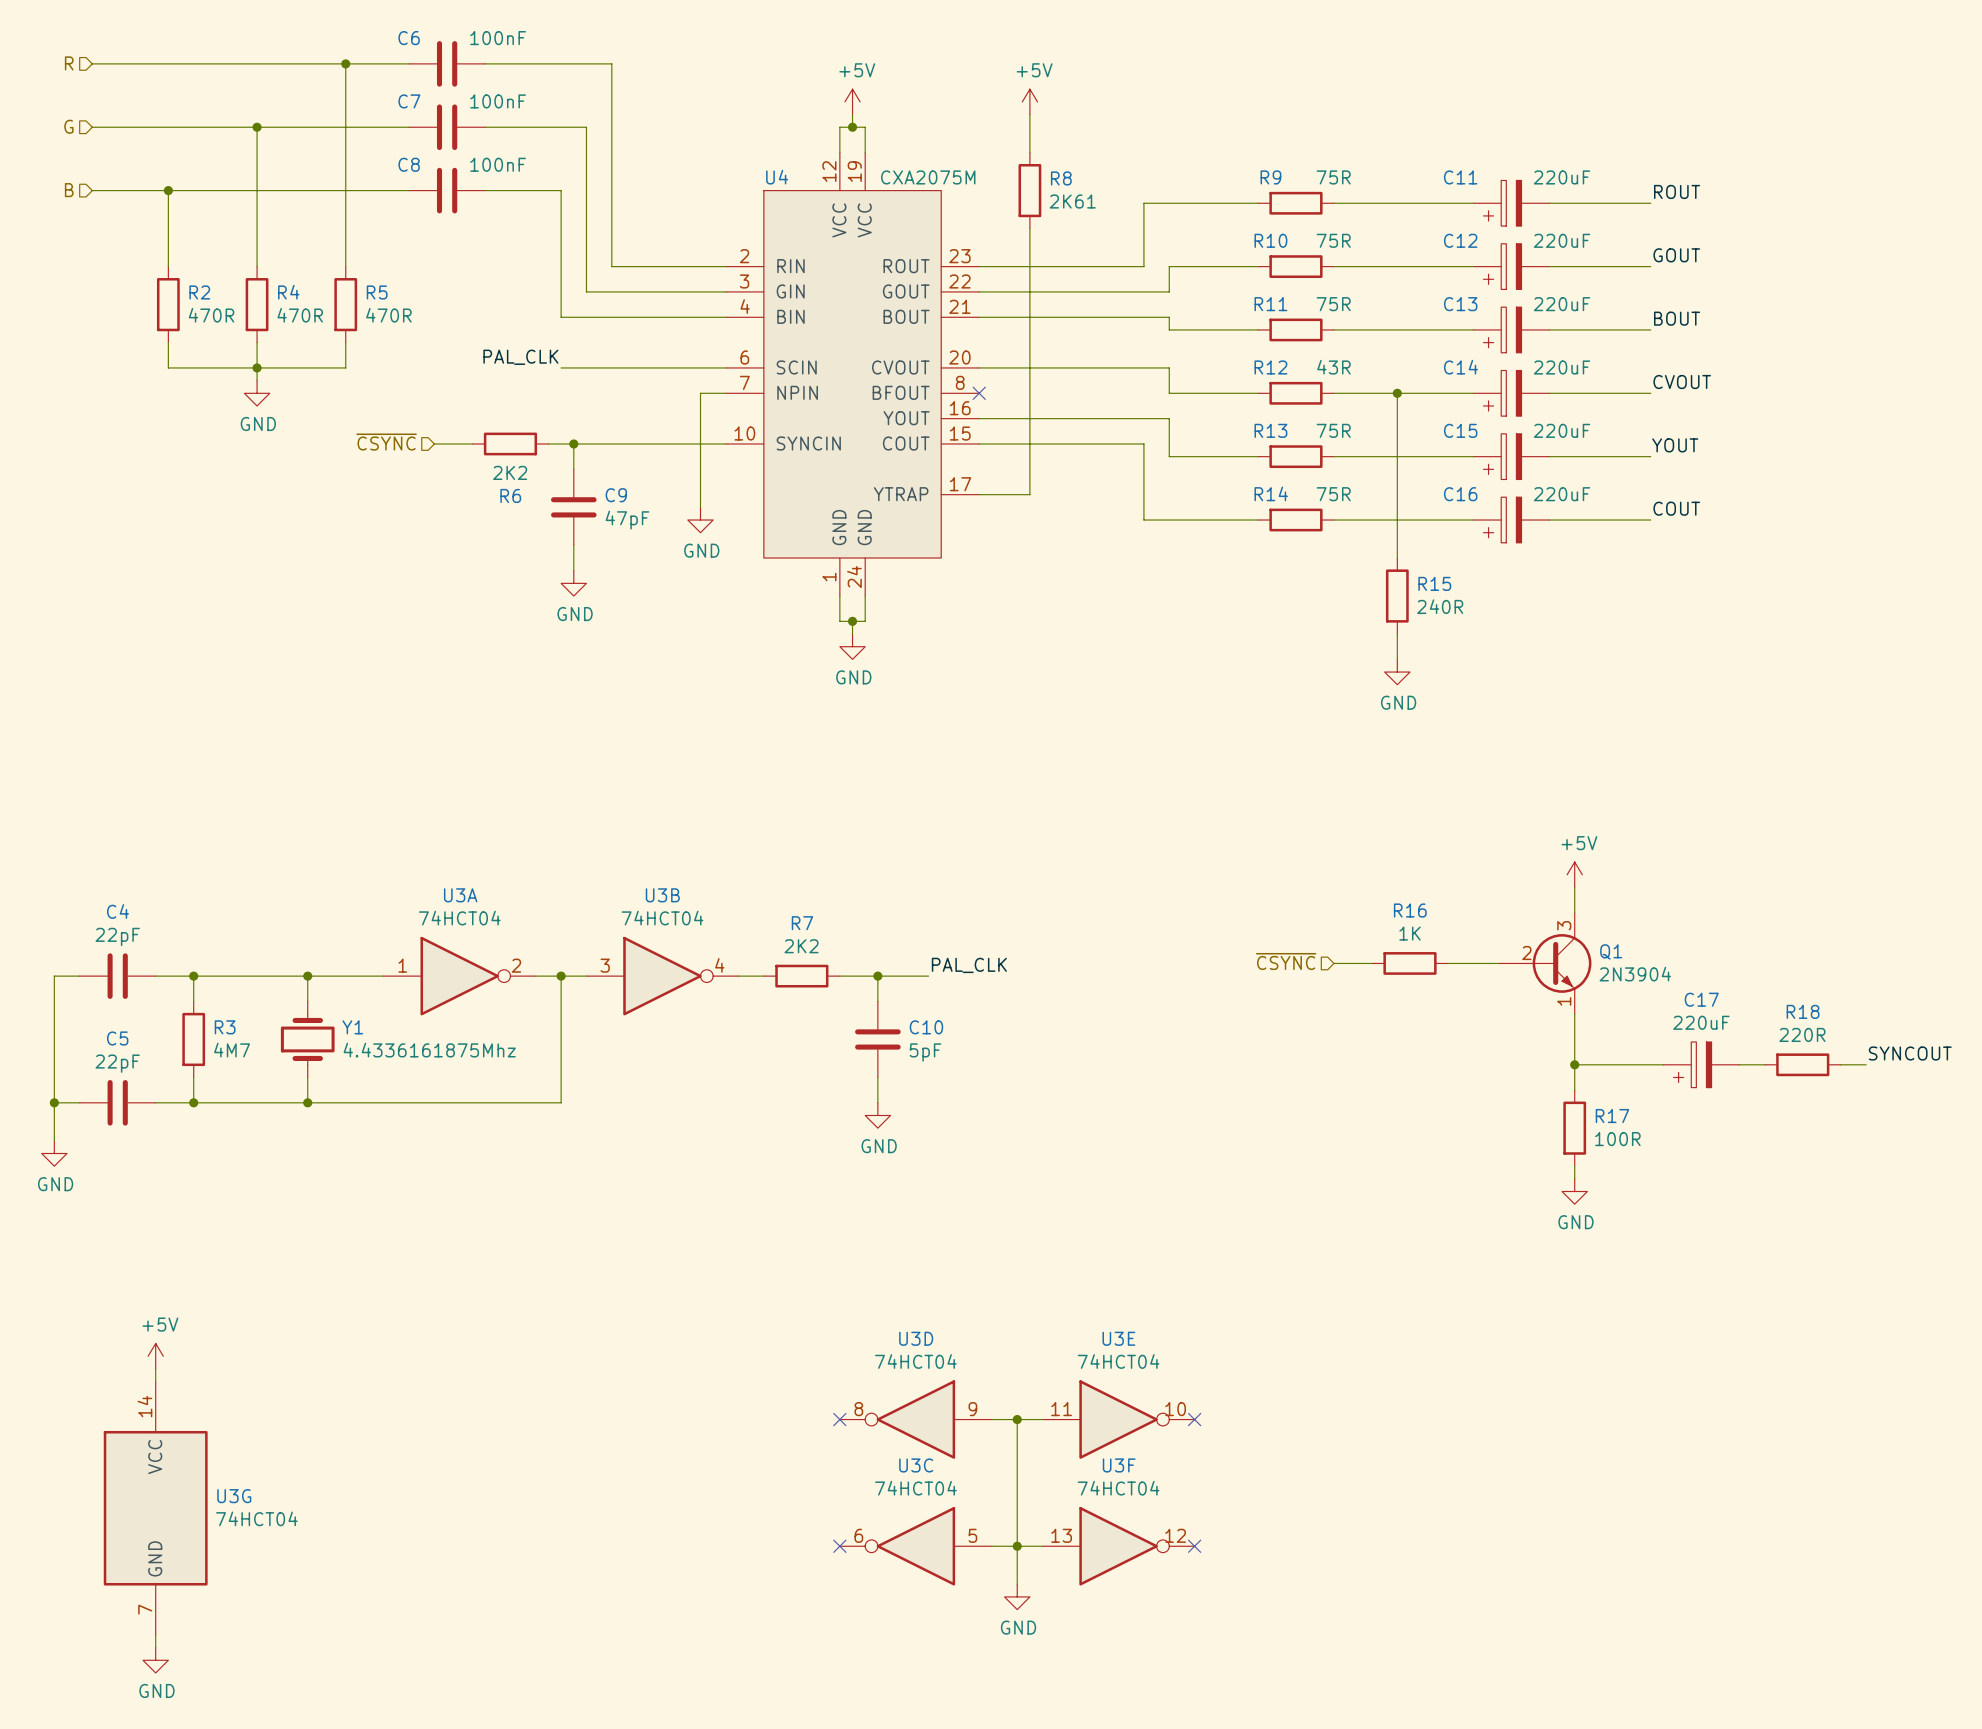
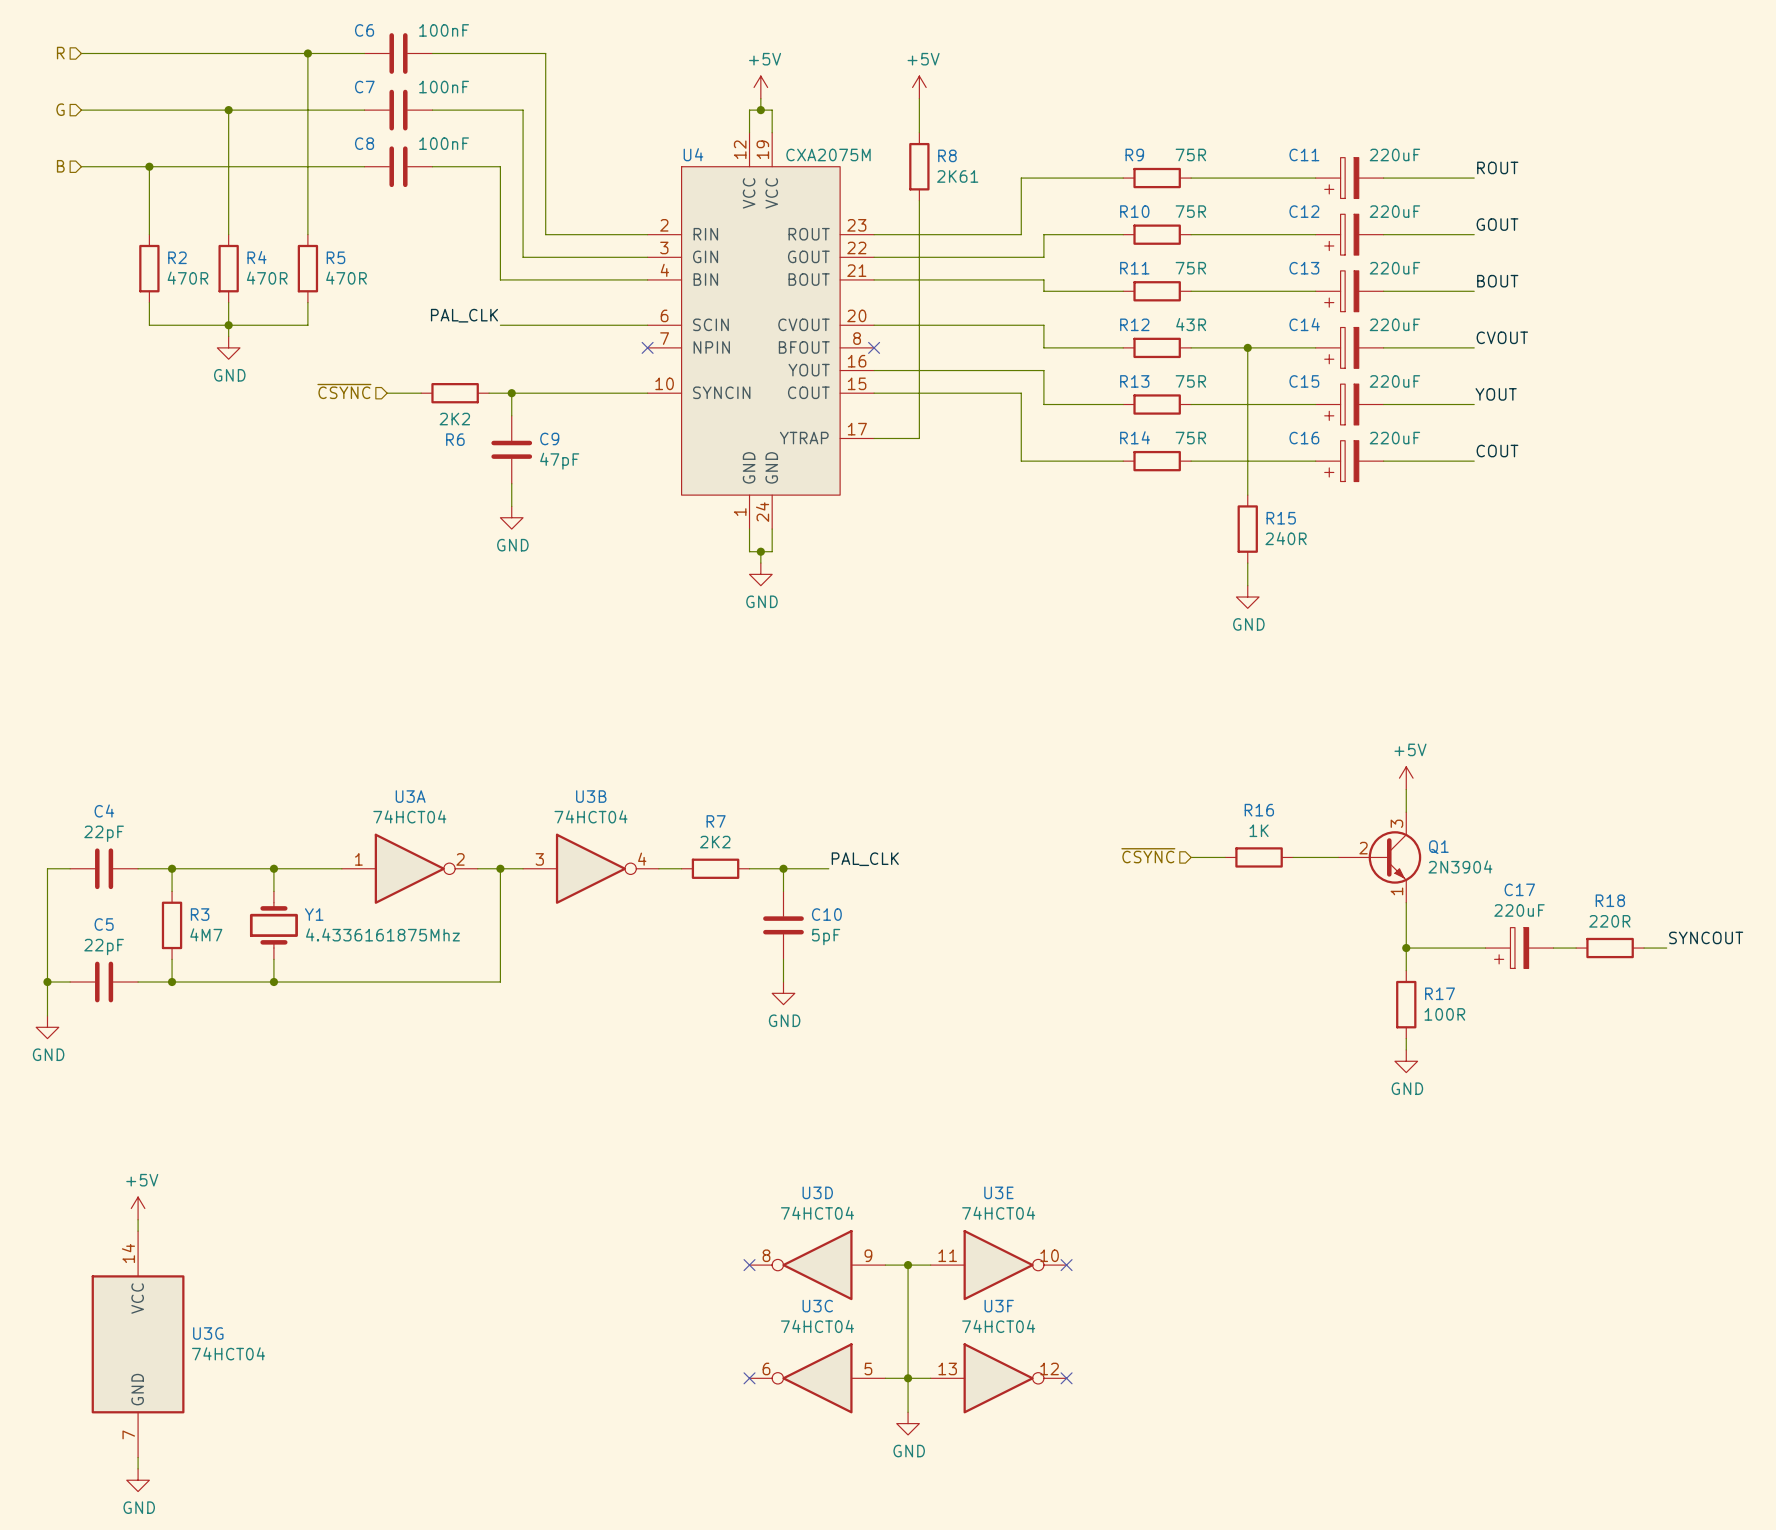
wire: (725, 393) (700, 393) (700, 507) -> none
no-connect mark: none -> (647, 347)
power symbol: GND (700, 520) -> none

